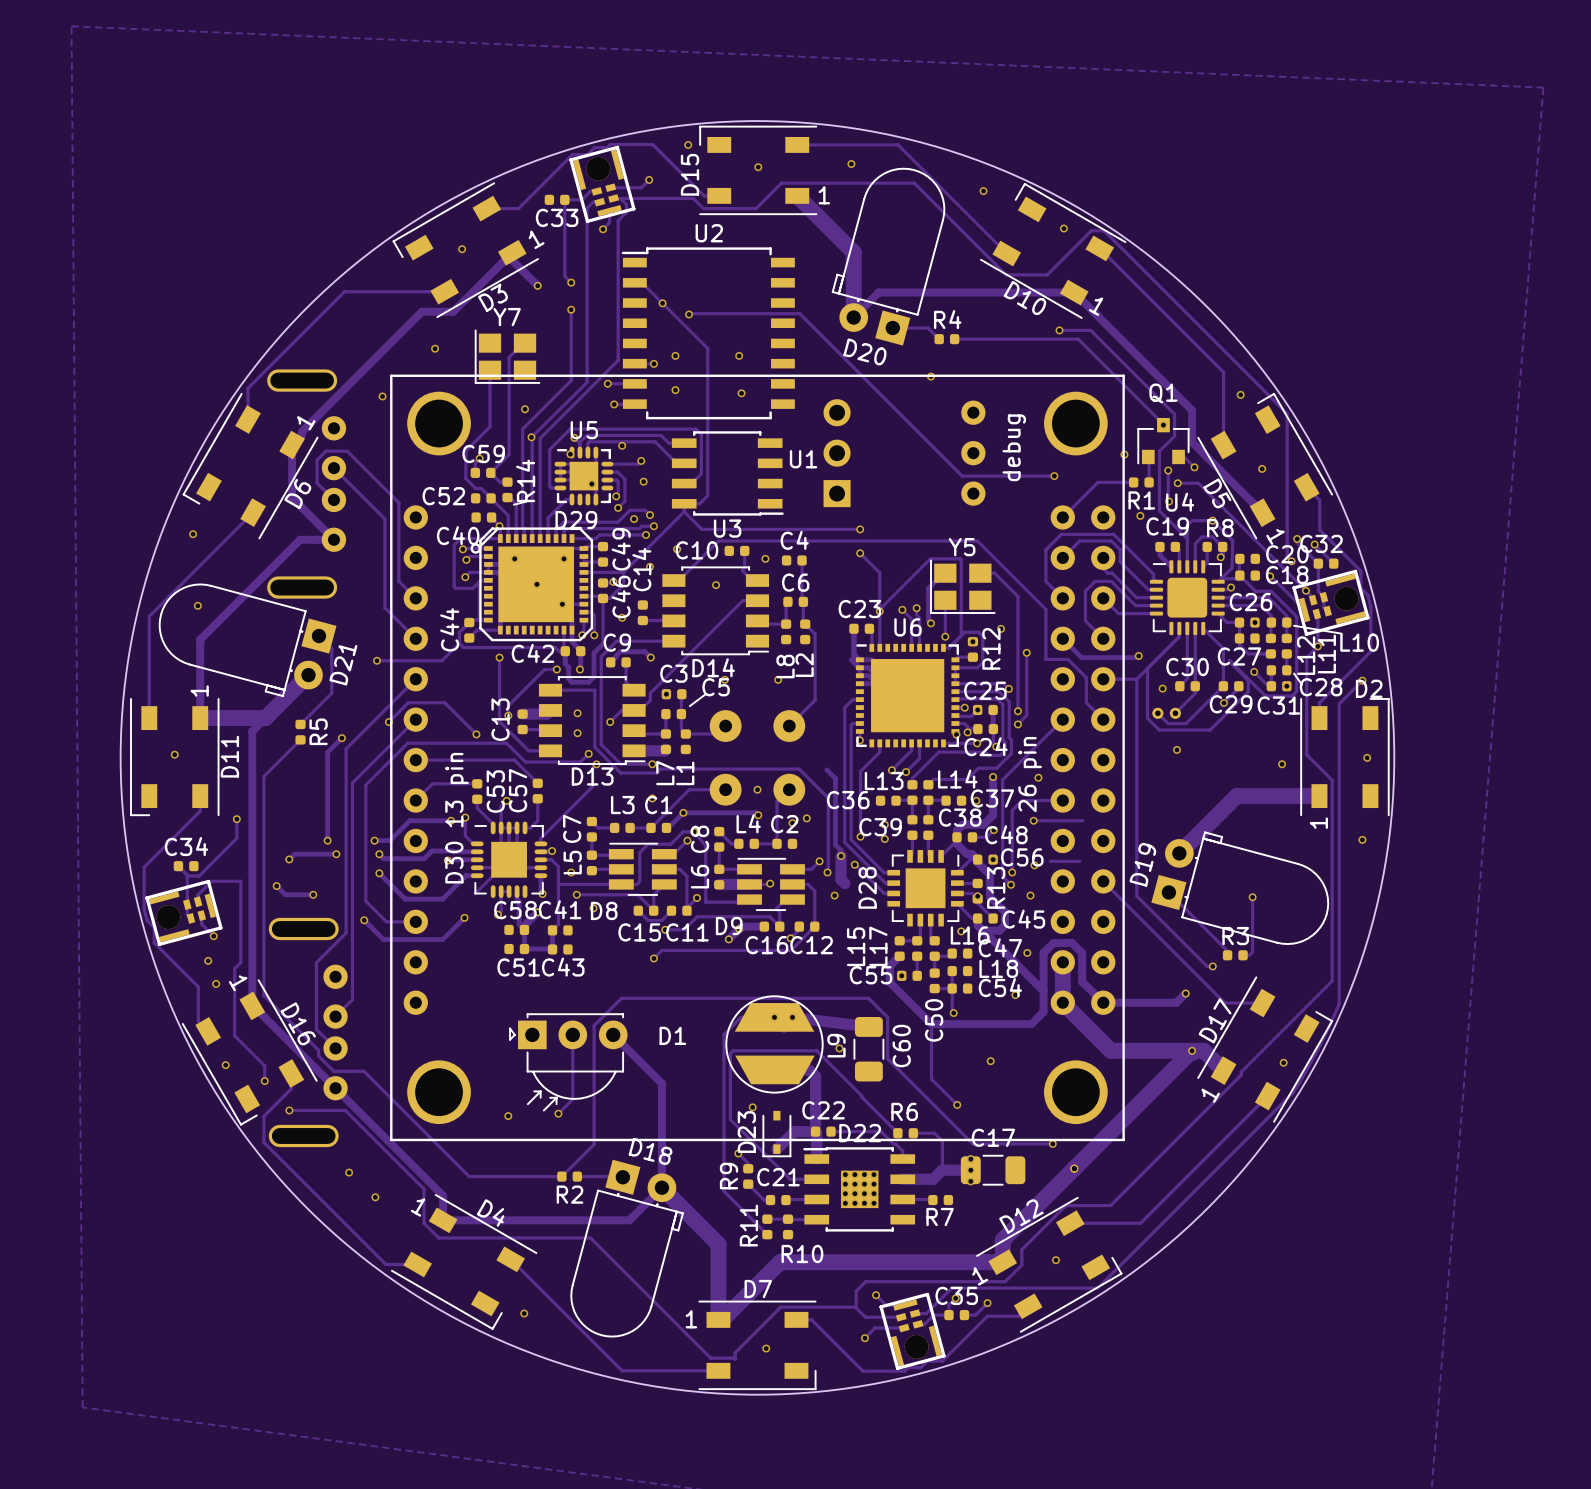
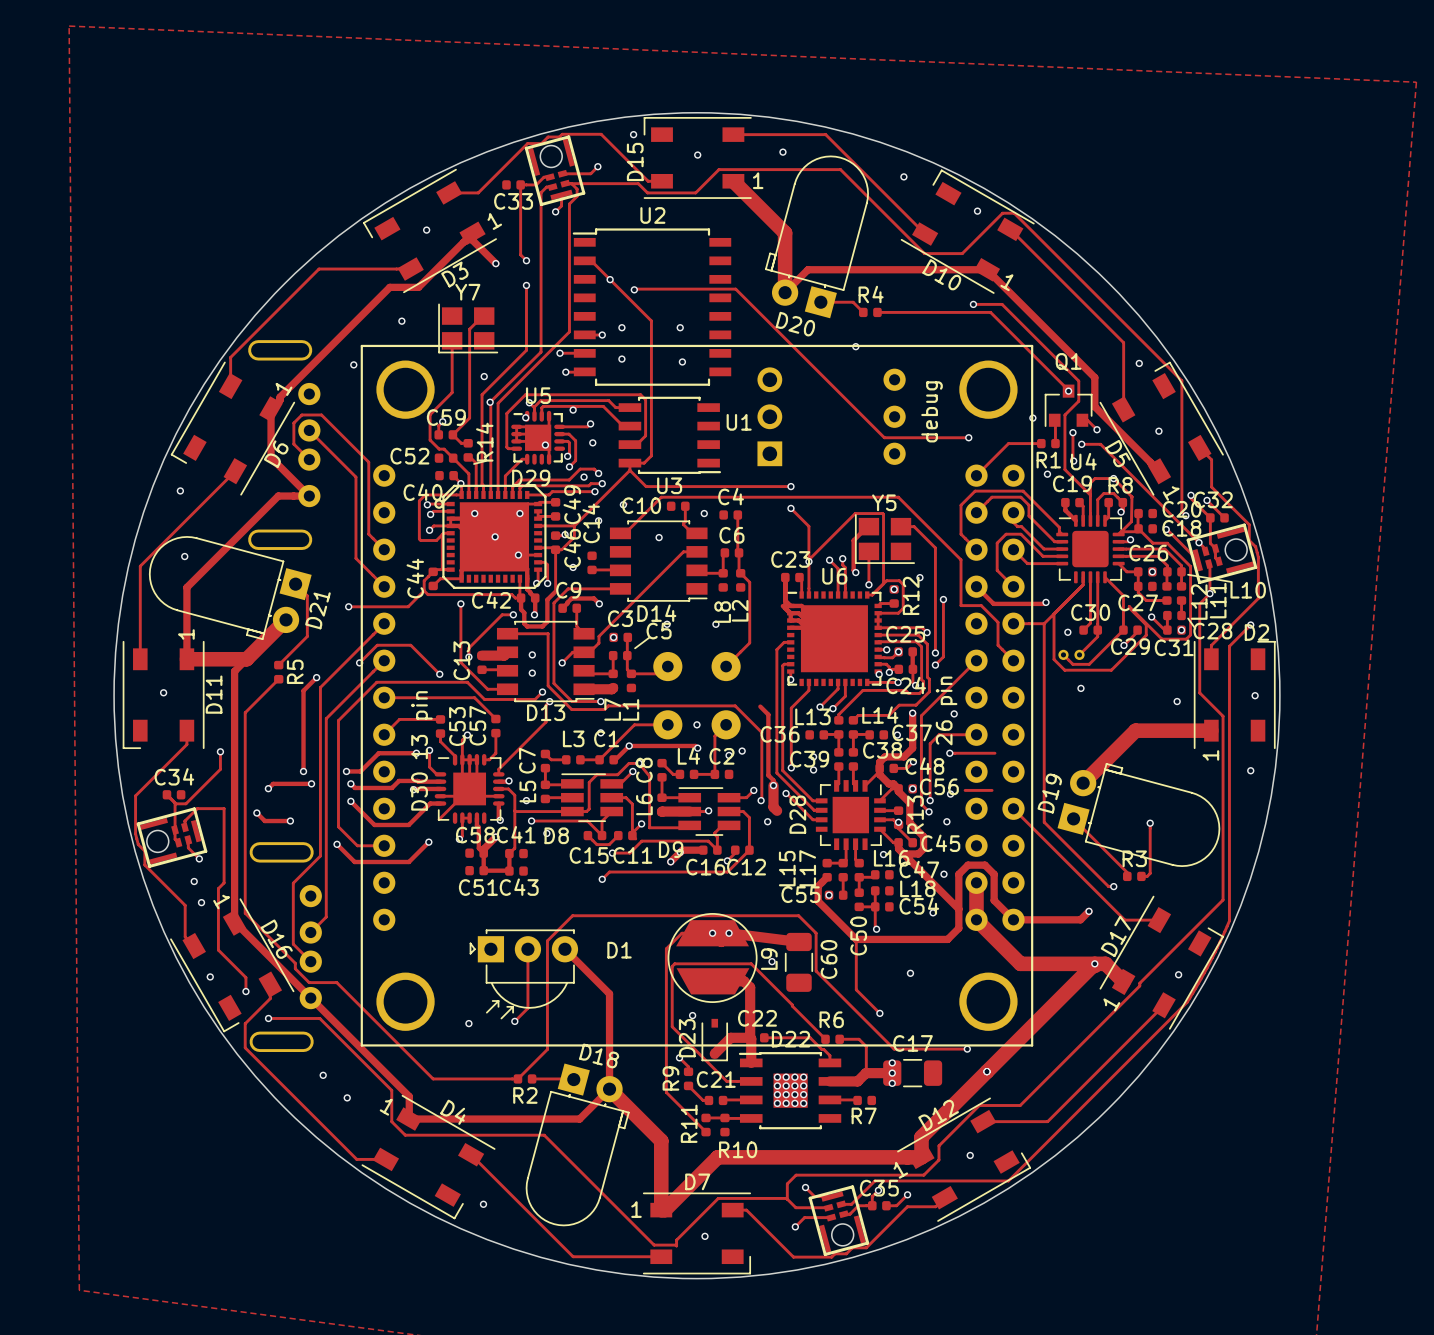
part footprint: [569, 145, 636, 223] -> [524, 135, 586, 207]
part footprint: [1292, 569, 1370, 636] -> [1186, 523, 1258, 585]
part footprint: [145, 879, 223, 946] -> [136, 807, 208, 868]
part footprint: [879, 1292, 946, 1370] -> [808, 1185, 870, 1256]

